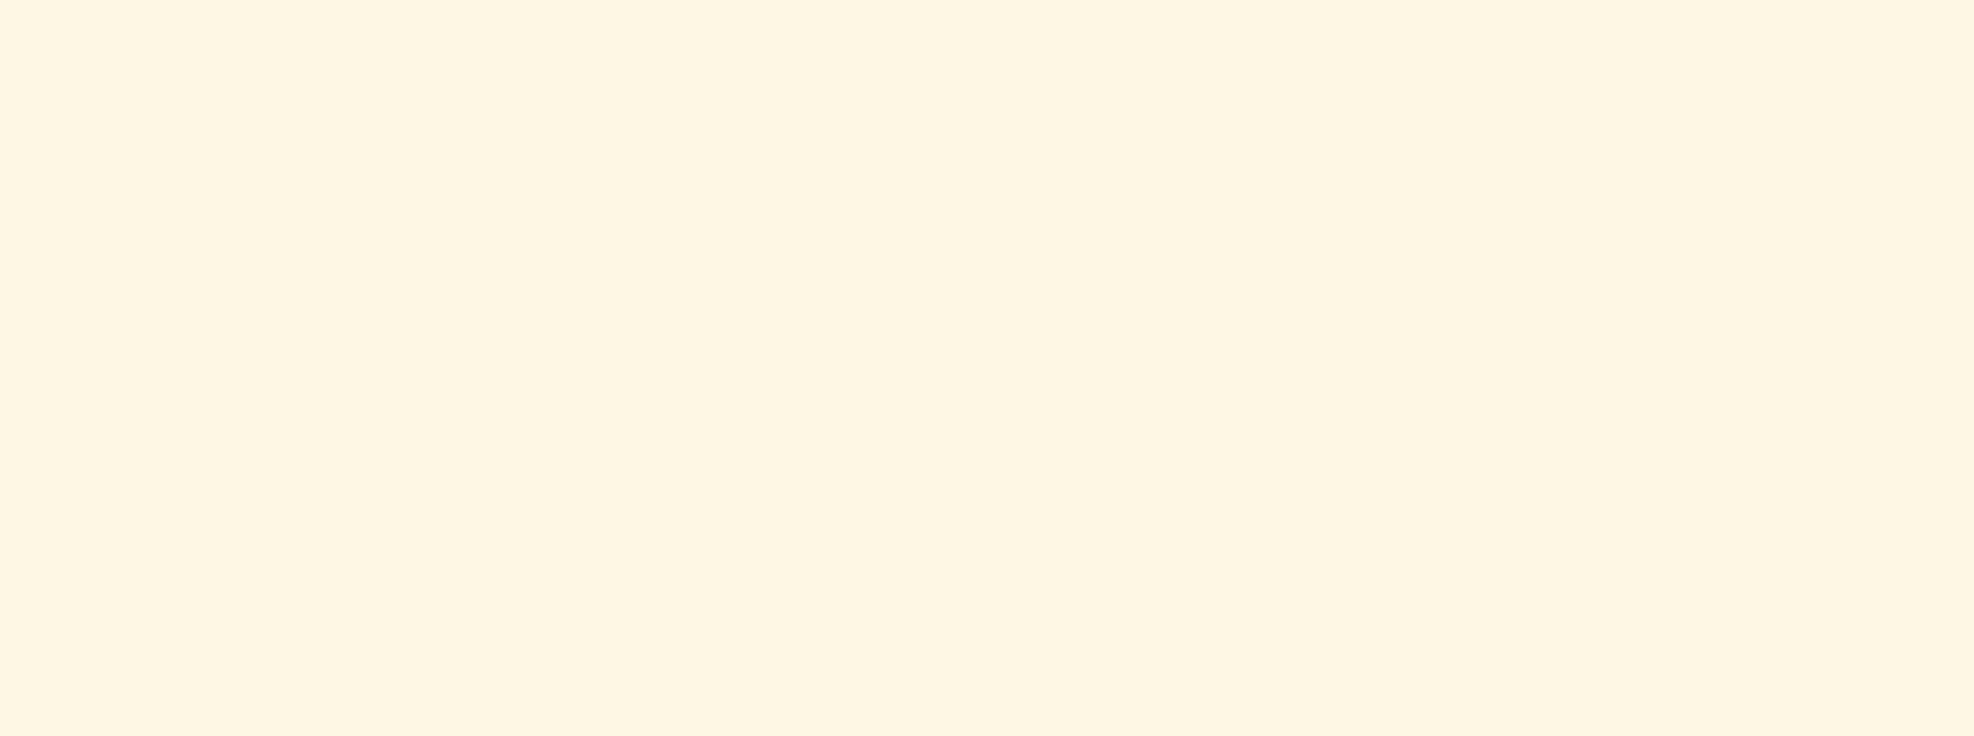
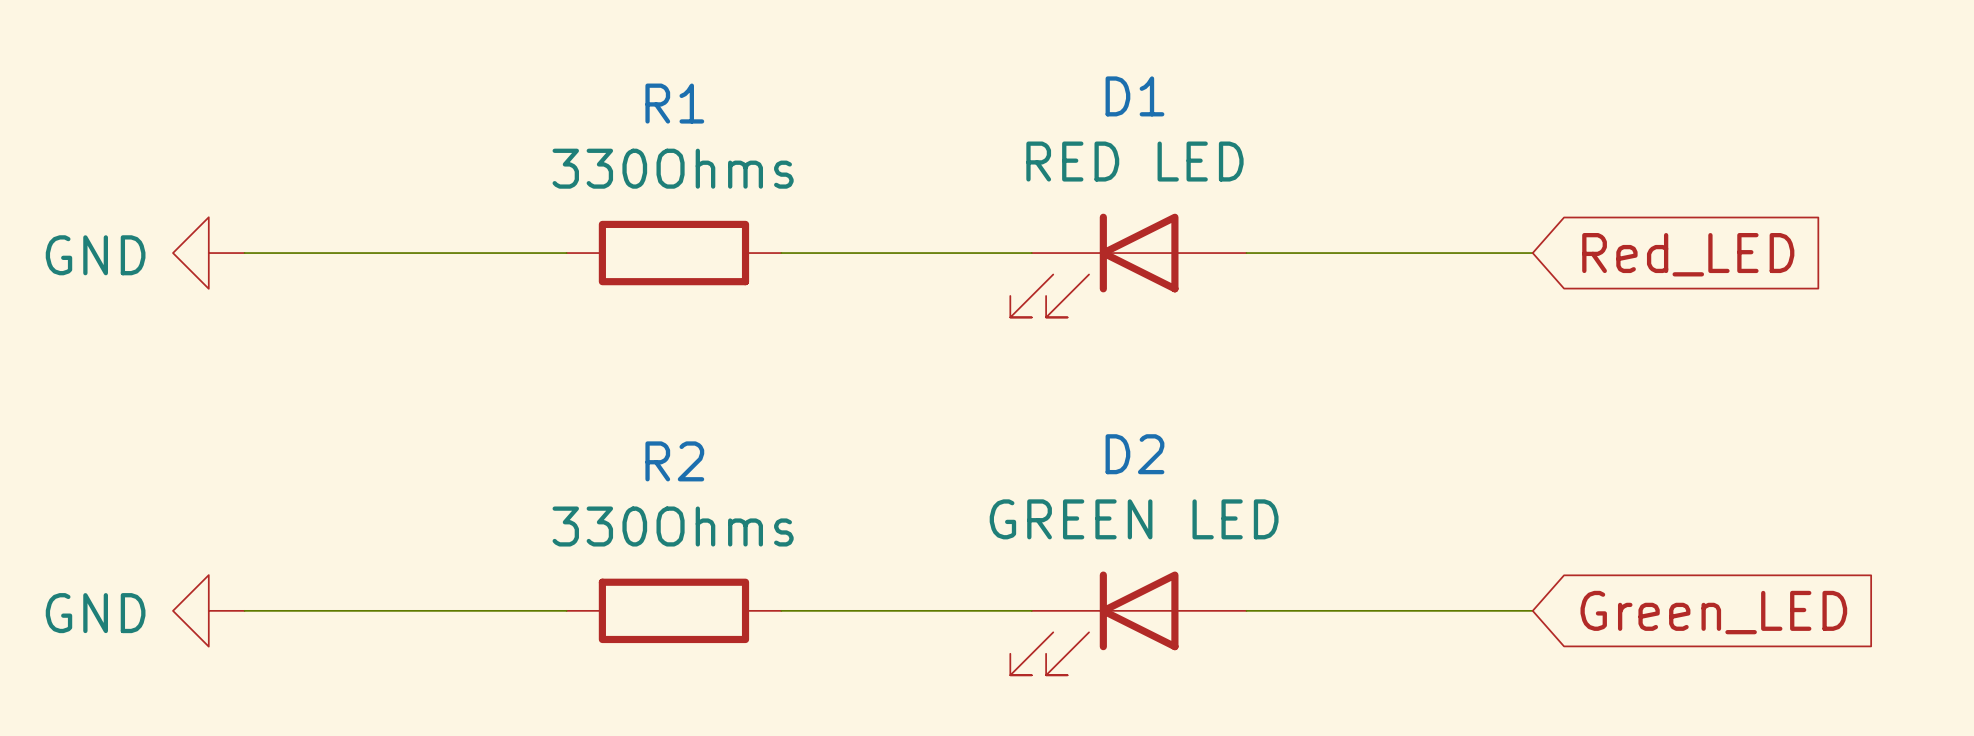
power symbol: none -> GND (208, 253)
wire: none -> (244, 253) (566, 253)
R1: none -> 330Ohms (673, 253)
wire: none -> (781, 253) (1031, 253)
wire: none -> (1246, 253) (1532, 253)
global label: none -> Red_LED (1688, 254)
D1: none -> RED LED (1128, 265)
power symbol: none -> GND (208, 610)
wire: none -> (244, 610) (566, 610)
R2: none -> 330Ohms (673, 610)
wire: none -> (781, 610) (1031, 610)
wire: none -> (1246, 610) (1532, 610)
global label: none -> Green_LED (1713, 612)
D2: none -> GREEN LED (1128, 623)

